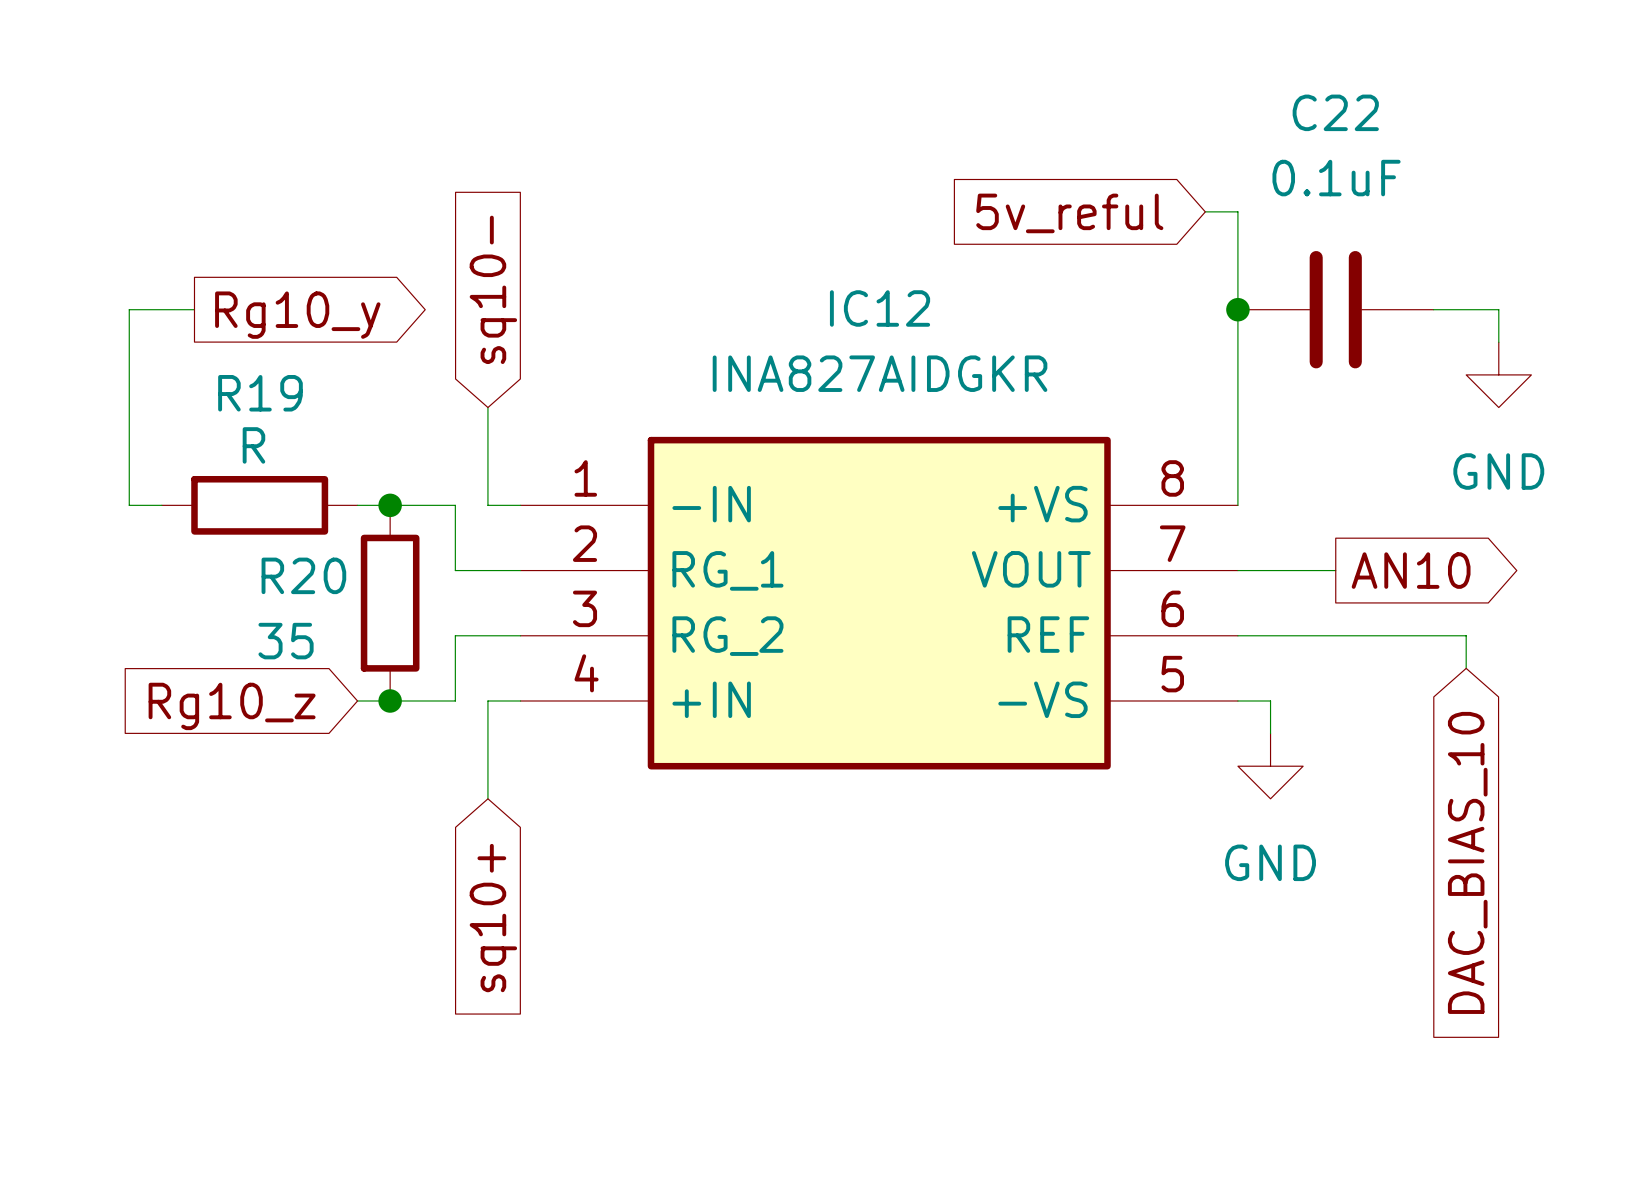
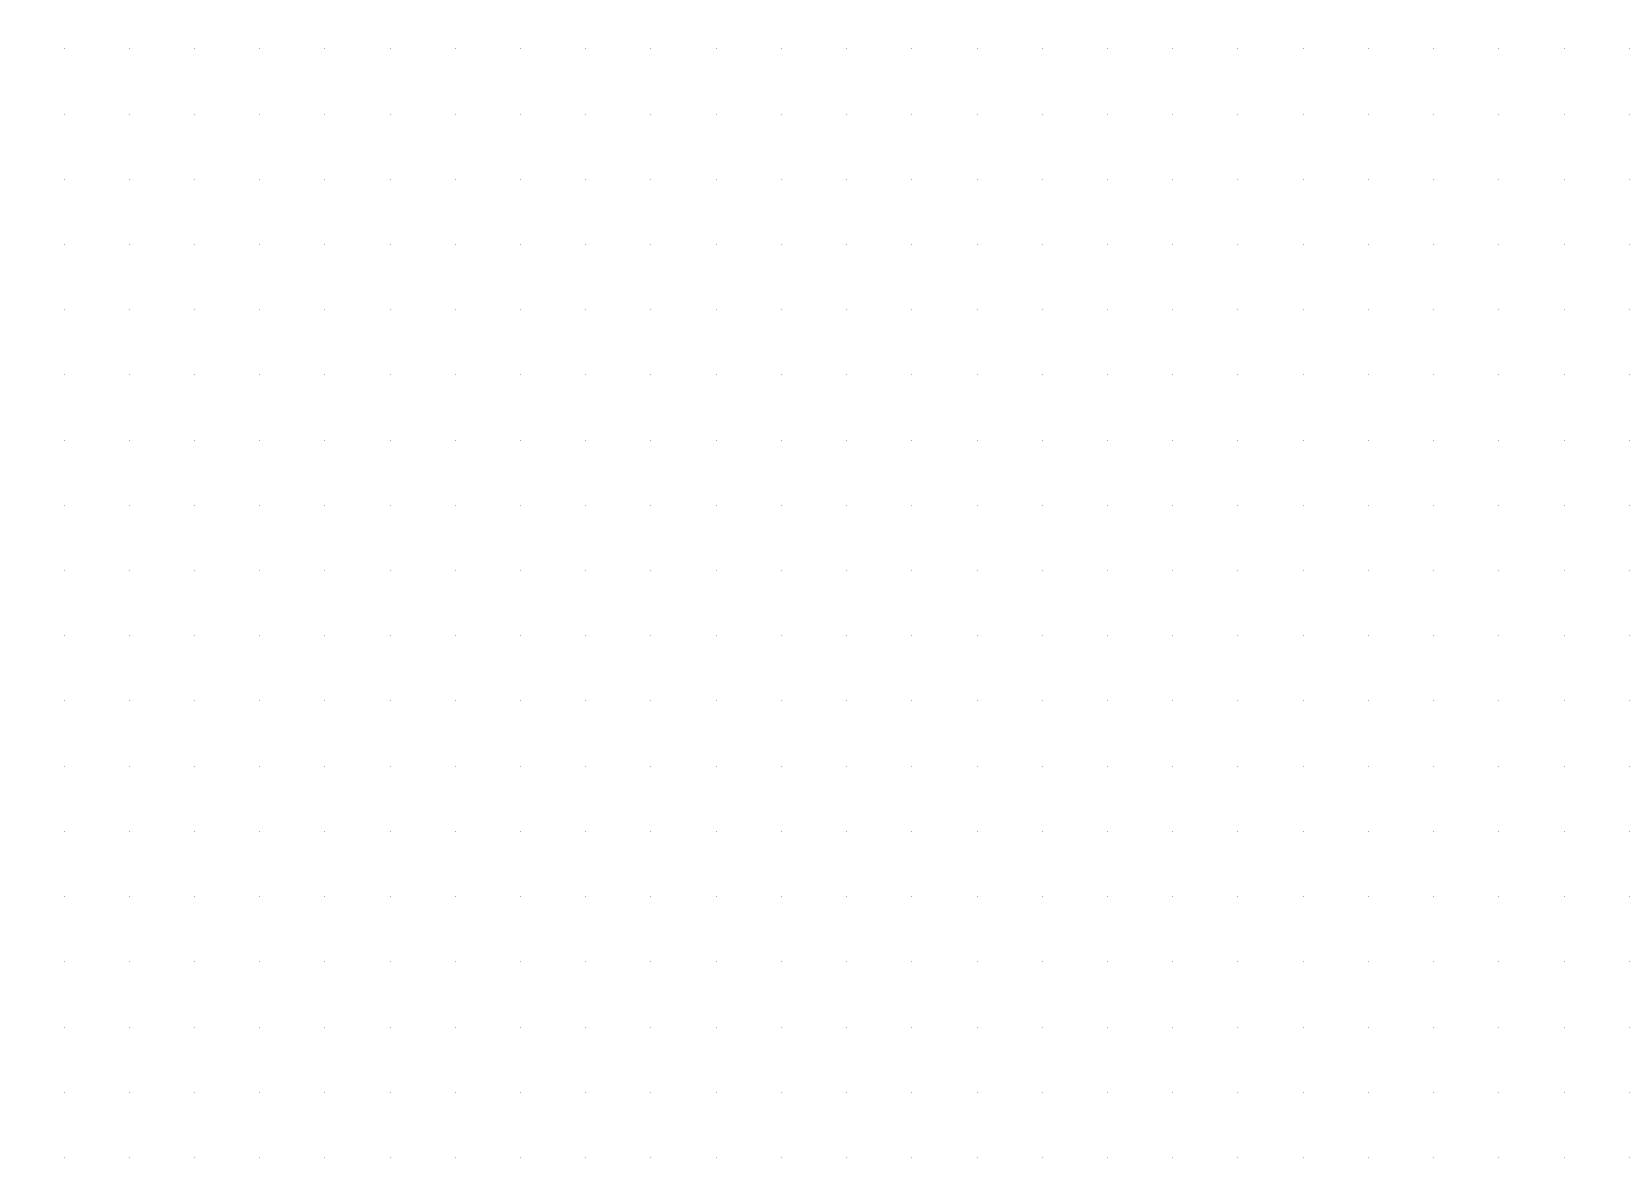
wire: (1205, 211) (1237, 211) (1237, 505) -> none
global label: 5v_reful (1069, 213) -> none
global label: sq10- (493, 289) -> none
wire: (194, 309) (129, 309) (129, 505) (161, 505) -> none
junction: (1237, 309) -> none
C22: 0.1uF (1335, 309) -> none
wire: (1433, 309) (1498, 309) (1498, 342) -> none
global label: Rg10_y (297, 315) -> none
power symbol: GND (1498, 374) -> none
wire: (487, 407) (487, 505) (520, 505) -> none
R19: R (259, 505) -> none
wire: (357, 505) (455, 505) (455, 570) (520, 570) -> none
junction: (390, 505) -> none
wire: (1237, 570) (1335, 570) -> none
global label: AN10 (1411, 570) -> none
R20: 35 (390, 603) -> none
IC12: INA827AIDGKR (879, 603) -> none
wire: (520, 635) (455, 635) (455, 700) (357, 700) -> none
wire: (1237, 635) (1466, 635) (1466, 668) -> none
junction: (390, 700) -> none
wire: (520, 700) (487, 700) (487, 798) -> none
wire: (1237, 700) (1270, 700) (1270, 733) -> none
global label: Rg10_z (232, 706) -> none
power symbol: GND (1270, 766) -> none
global label: DAC_BIAS_10 (1467, 862) -> none
global label: sq10+ (493, 918) -> none

